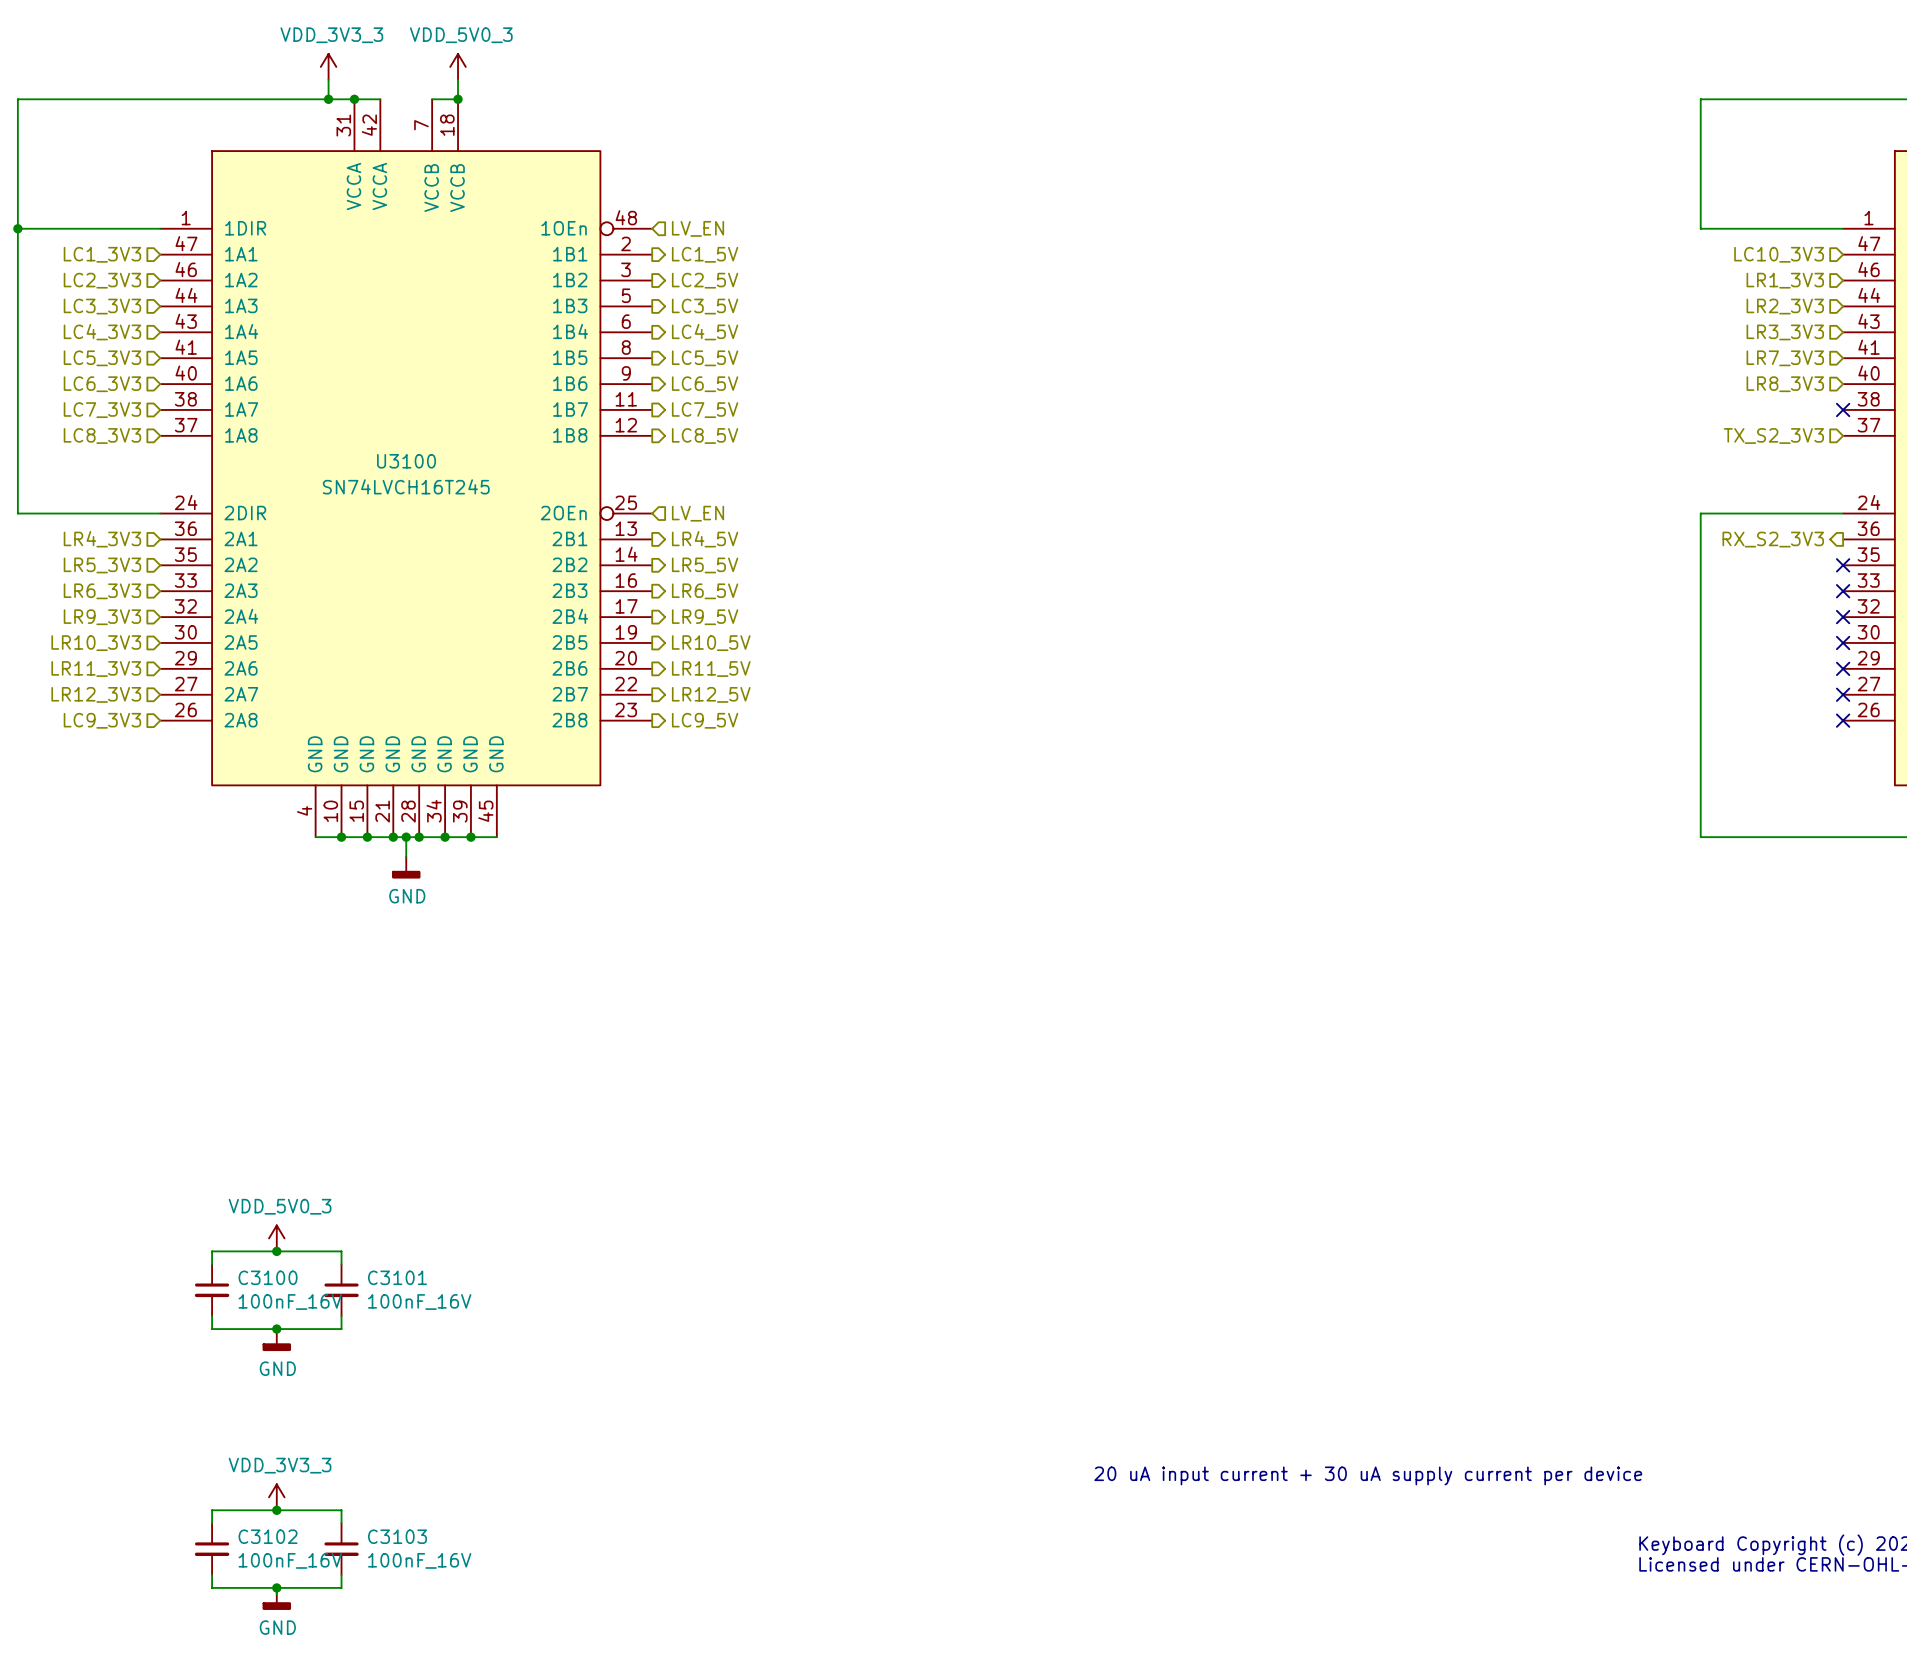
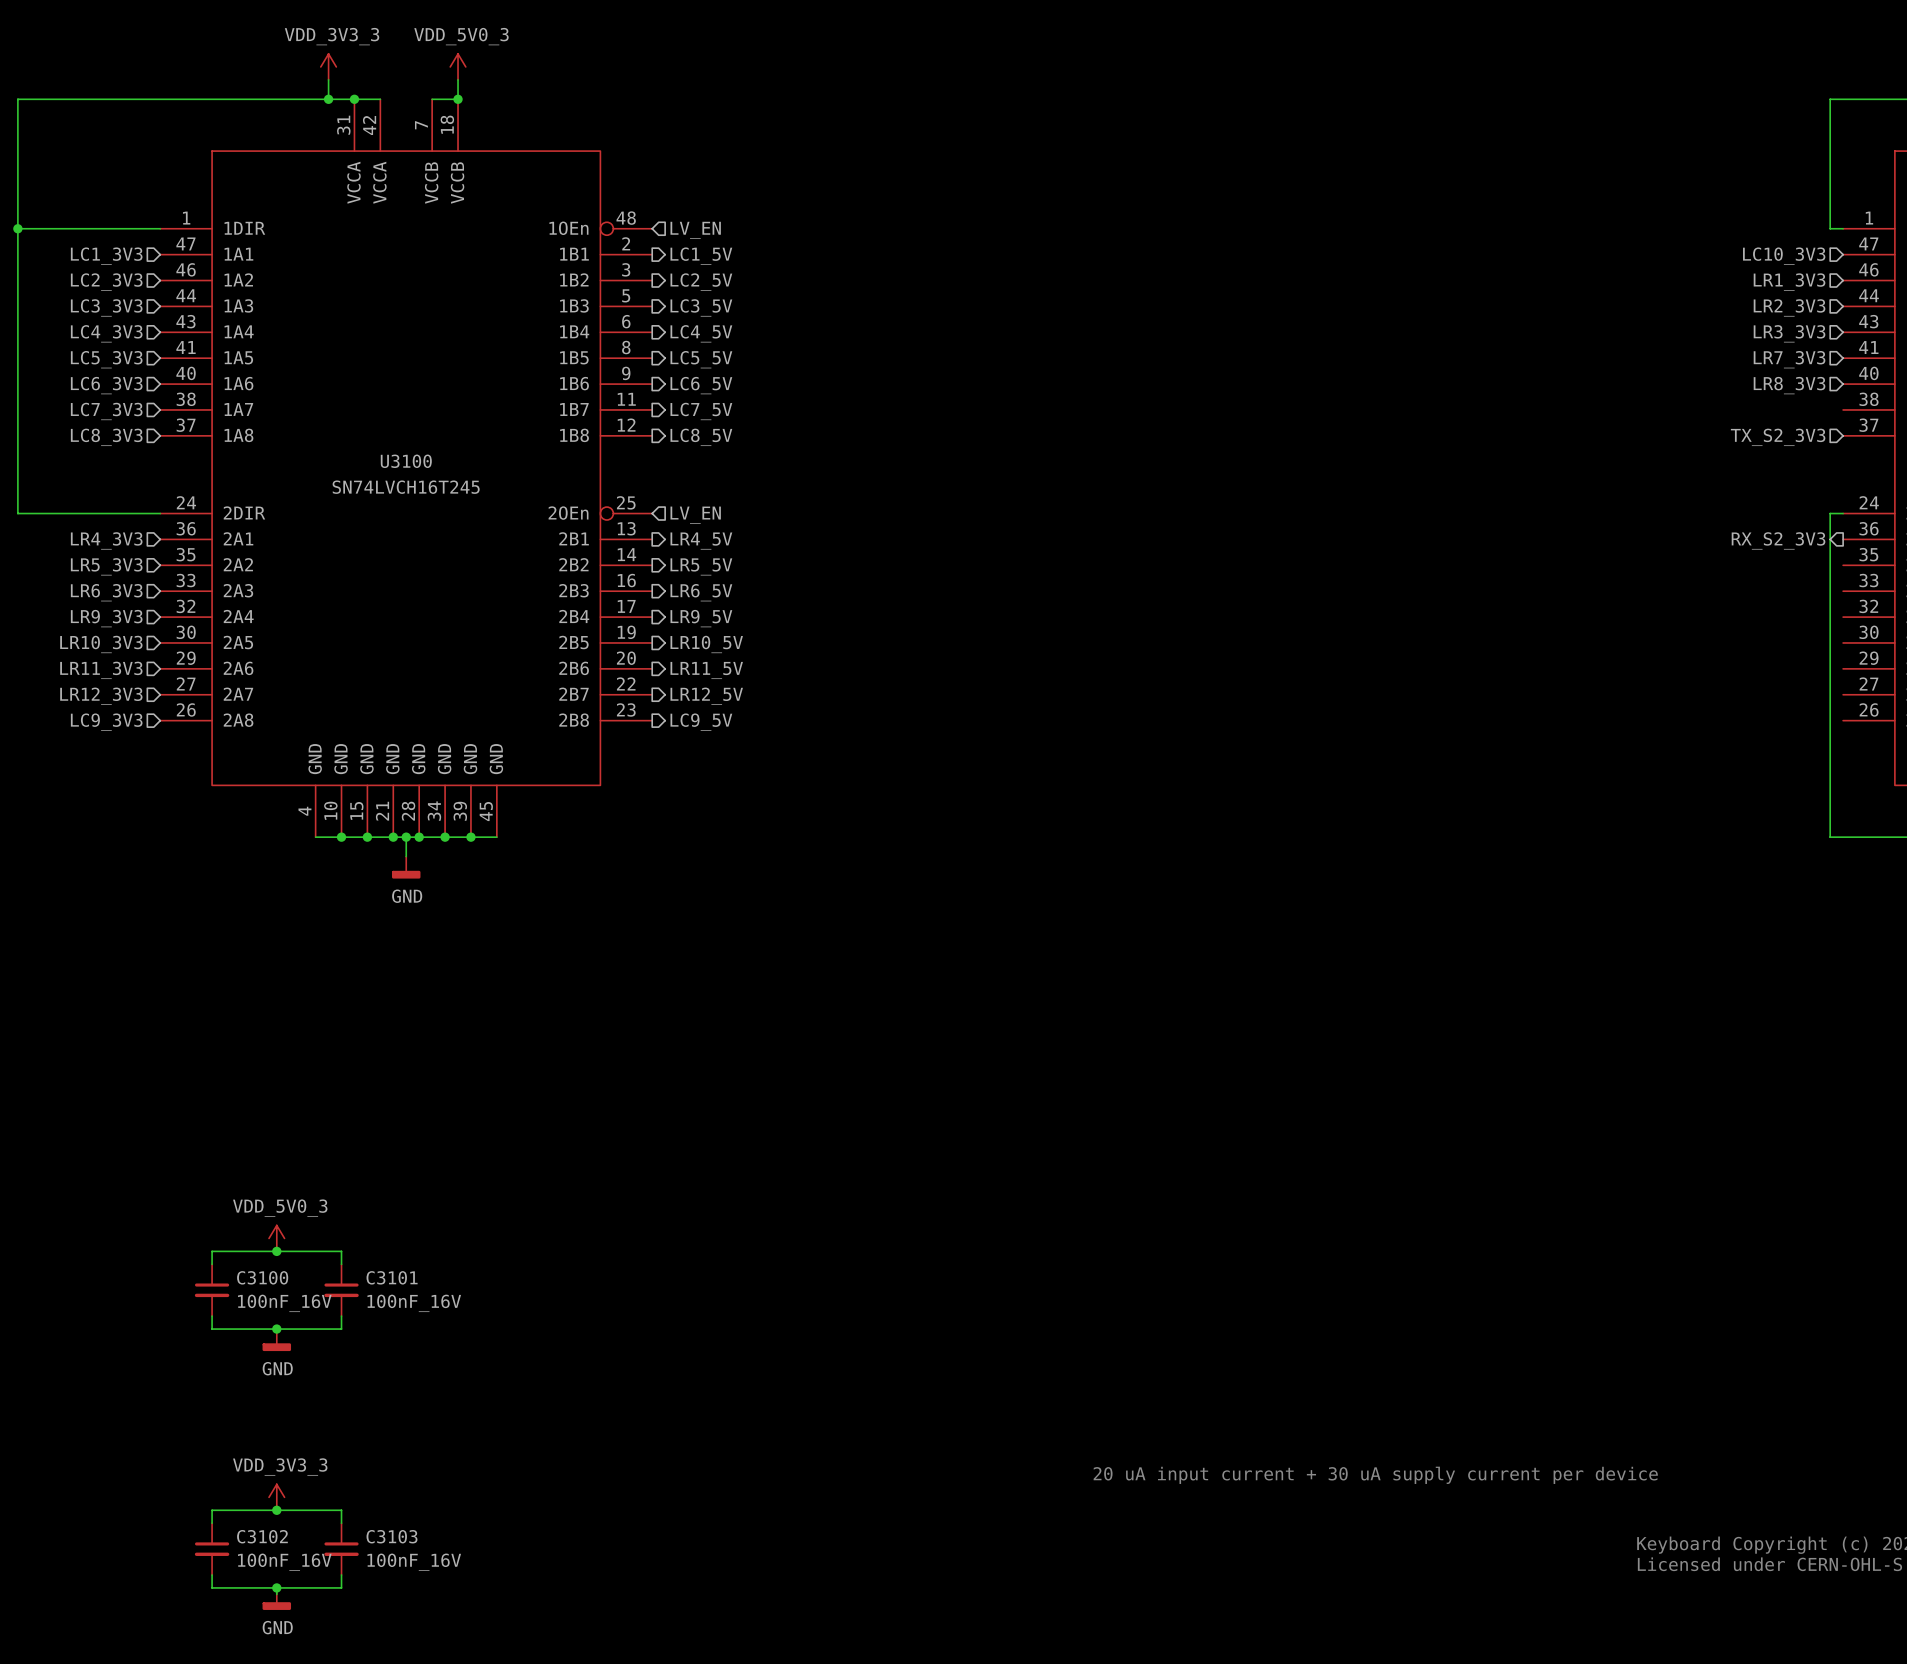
wire: (1830, 99) (1700, 99) (1700, 228) (1830, 228) -> (1830, 99) (1830, 228)
no-connect mark: (1843, 409) -> none
wire: (1830, 513) (1700, 513) (1700, 837) (1830, 837) -> (1830, 513) (1830, 837)
no-connect mark: (1843, 565) -> none
no-connect mark: (1843, 591) -> none
no-connect mark: (1843, 617) -> none
no-connect mark: (1843, 642) -> none
no-connect mark: (1843, 668) -> none
no-connect mark: (1843, 694) -> none
no-connect mark: (1843, 720) -> none

